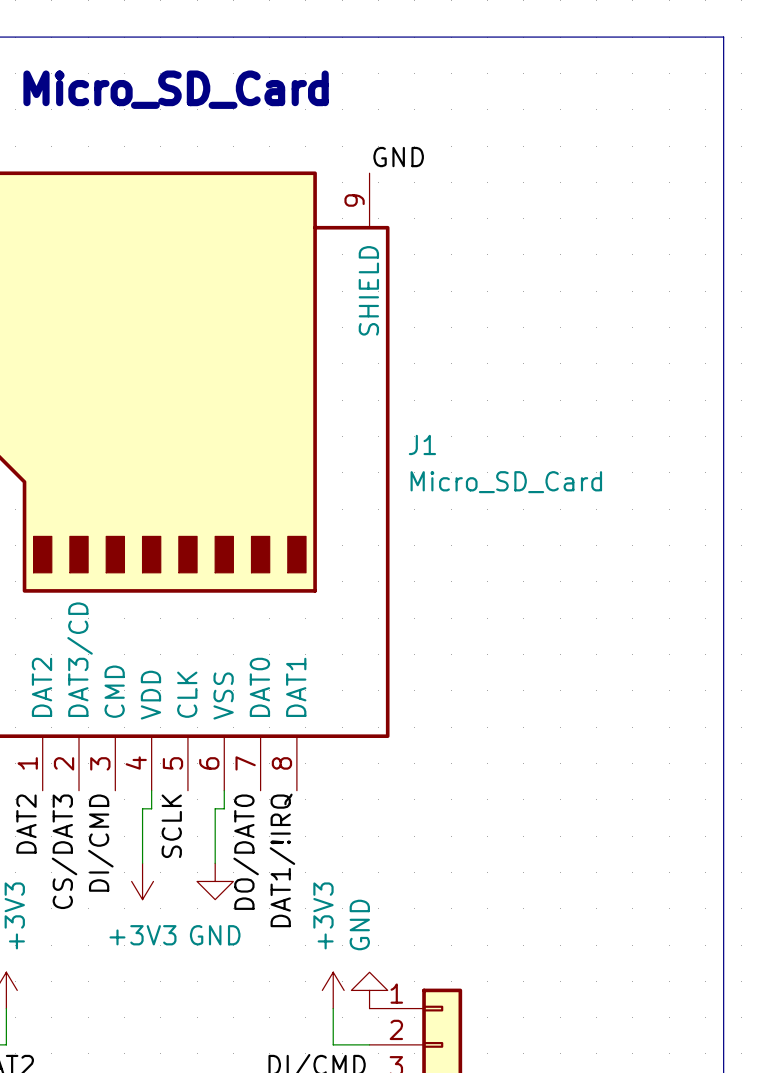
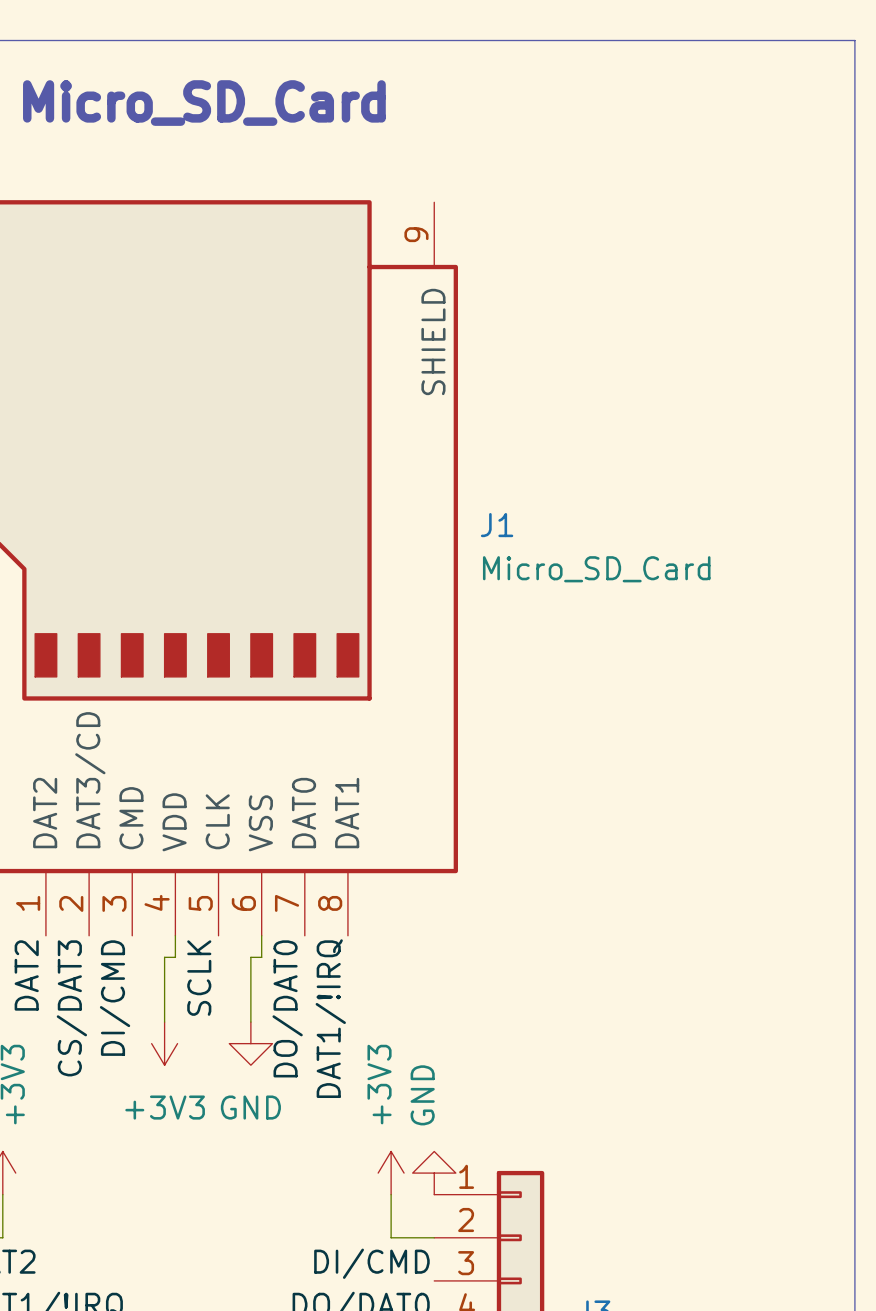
label: GND (398, 157) -> none

